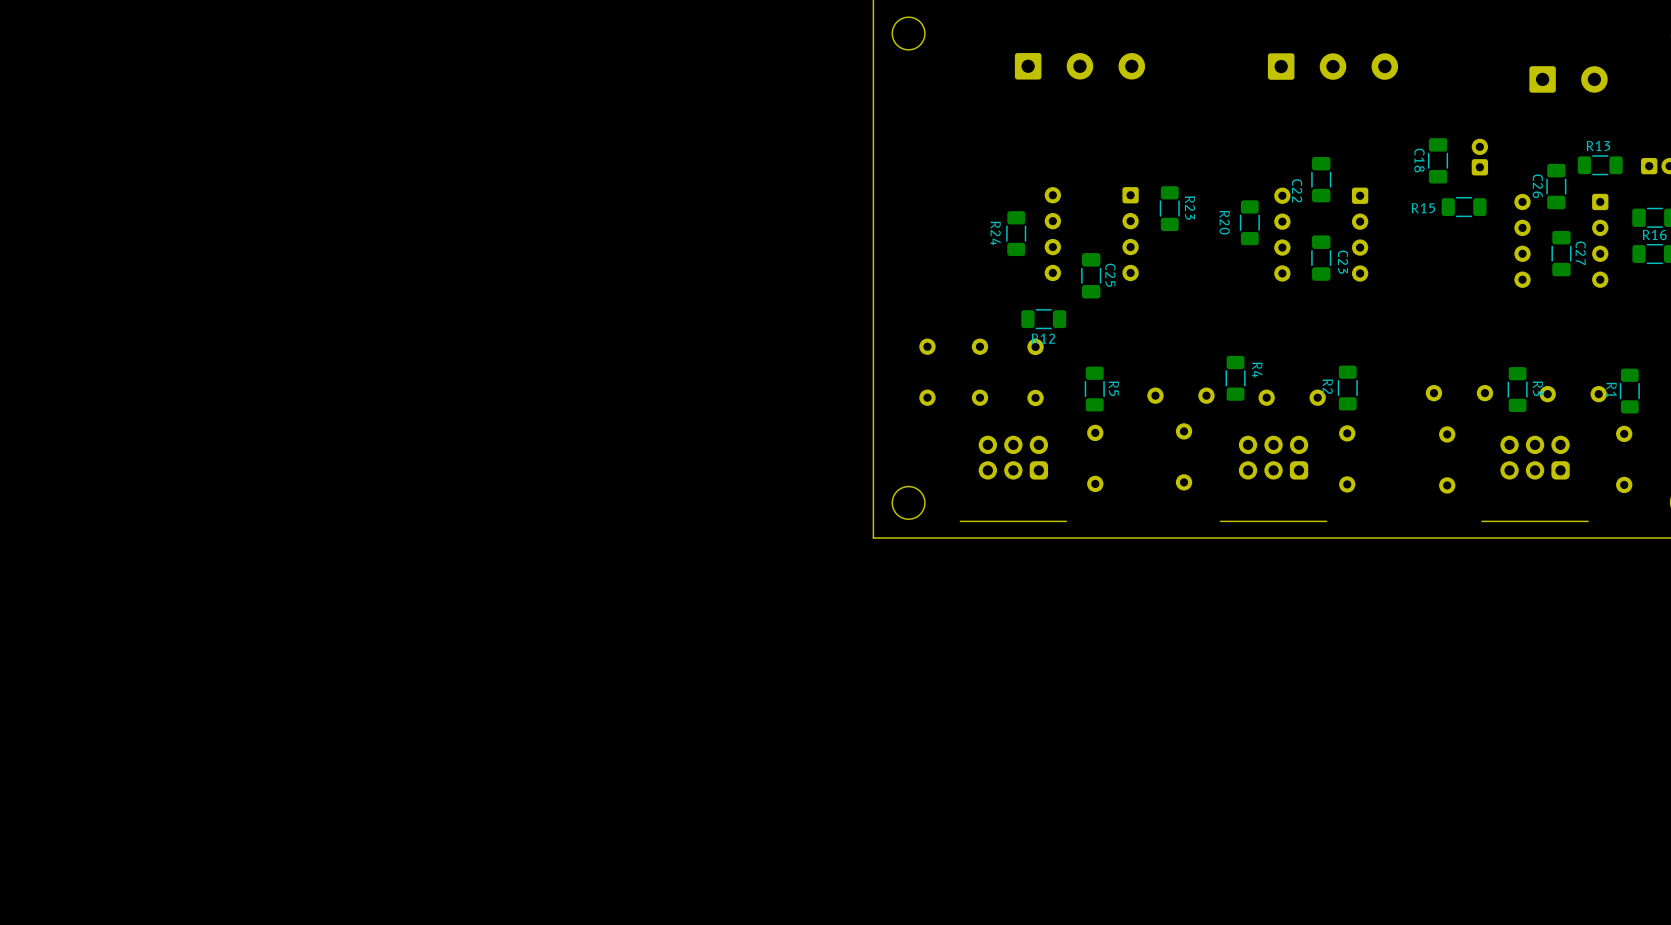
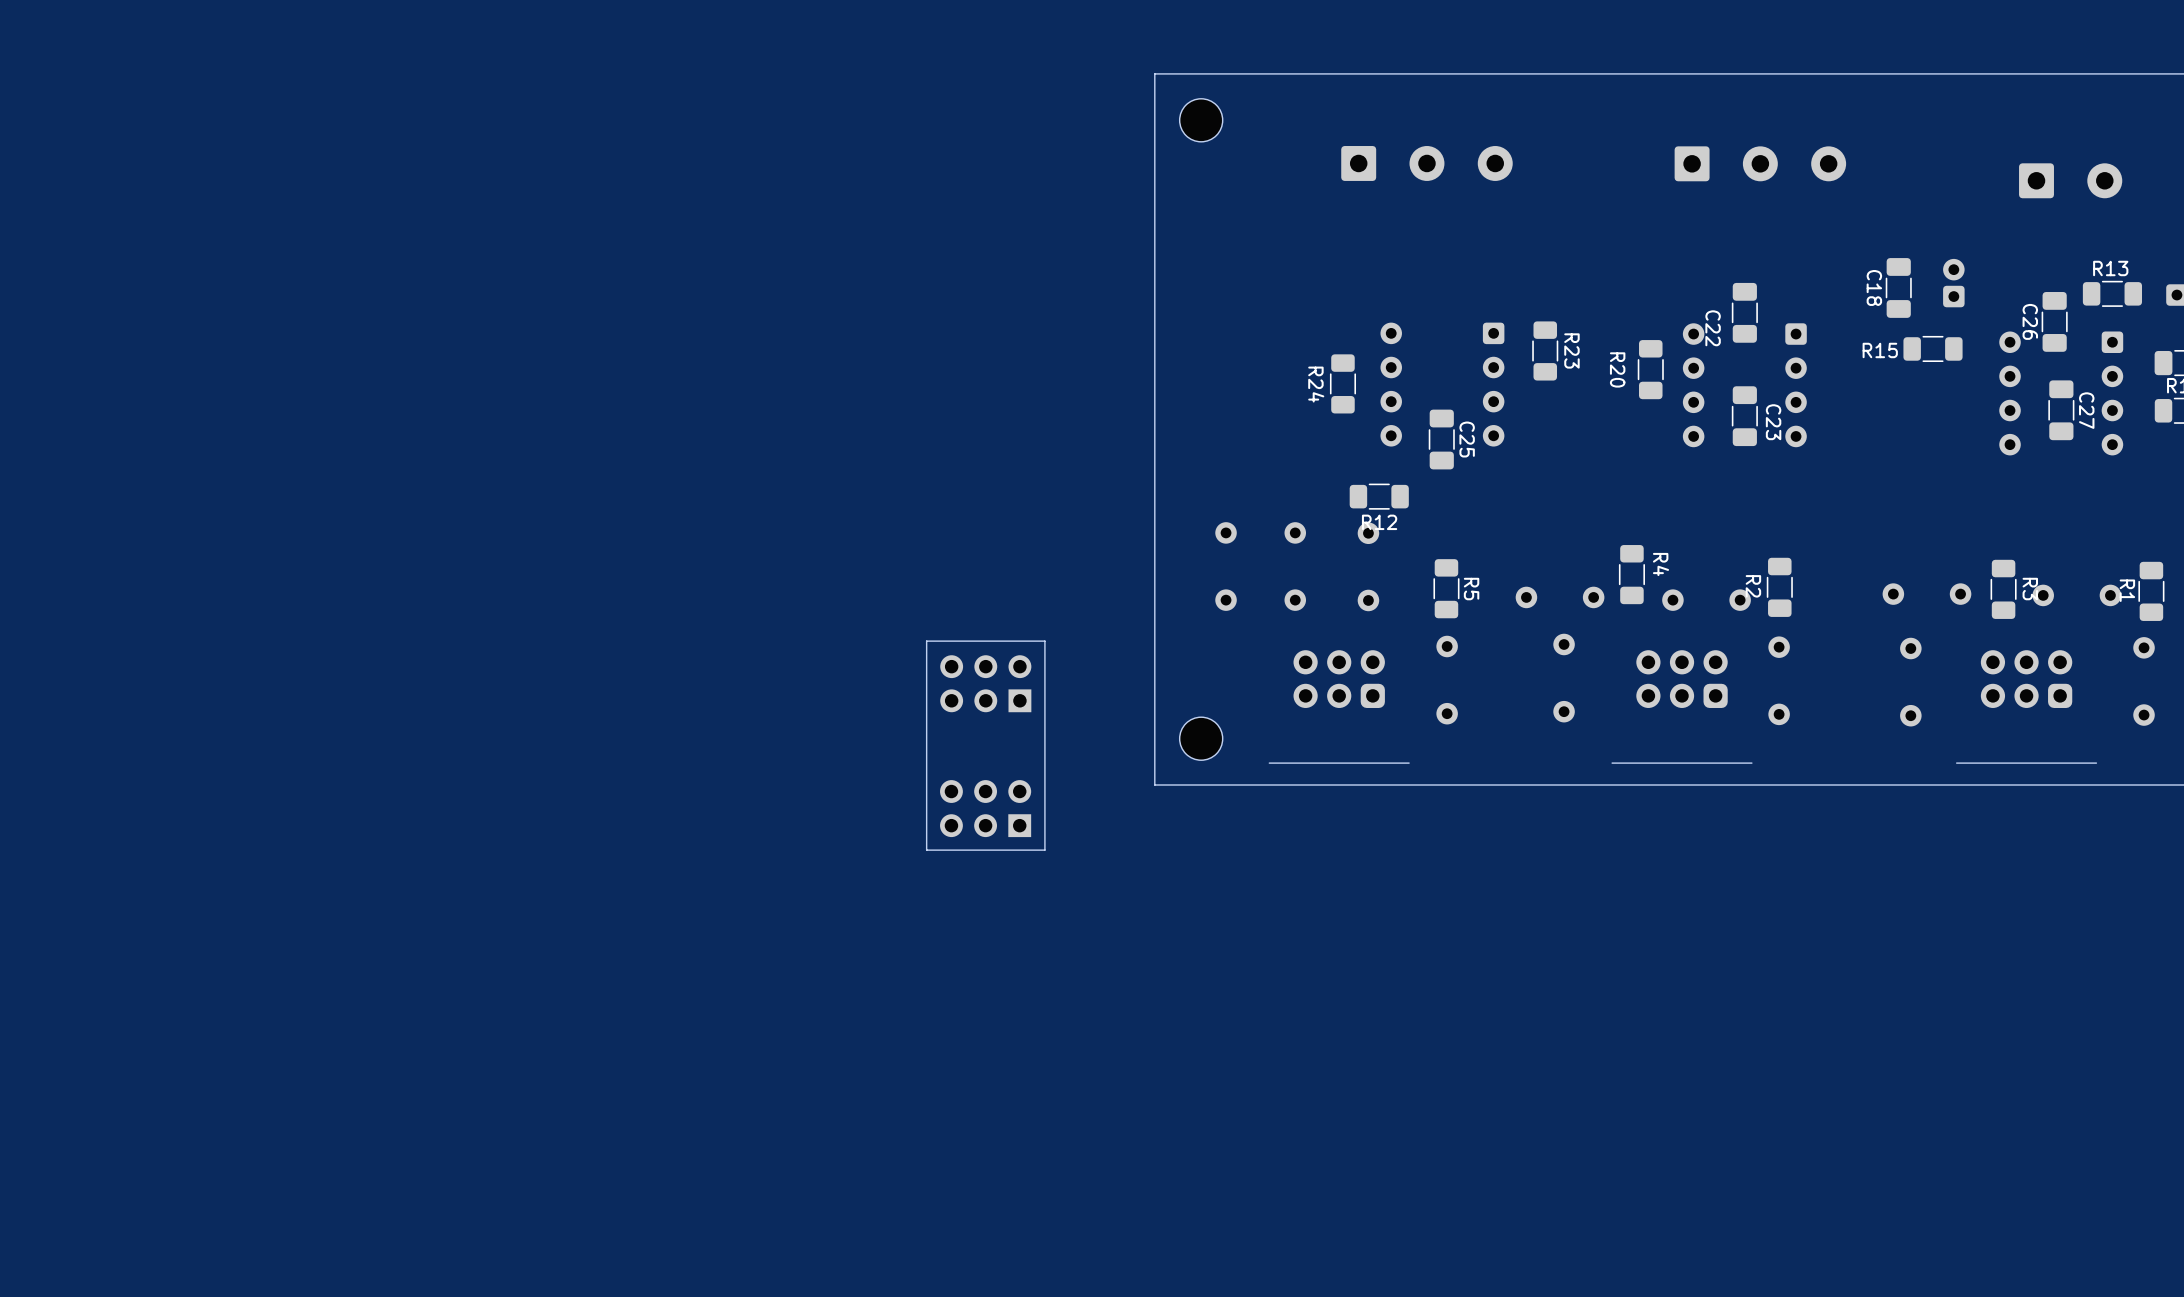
board edge: none -> (1044, 641) (926, 641) (926, 850) (1044, 850) (1044, 641)
part: none -> (985, 683)
part: none -> (985, 808)

